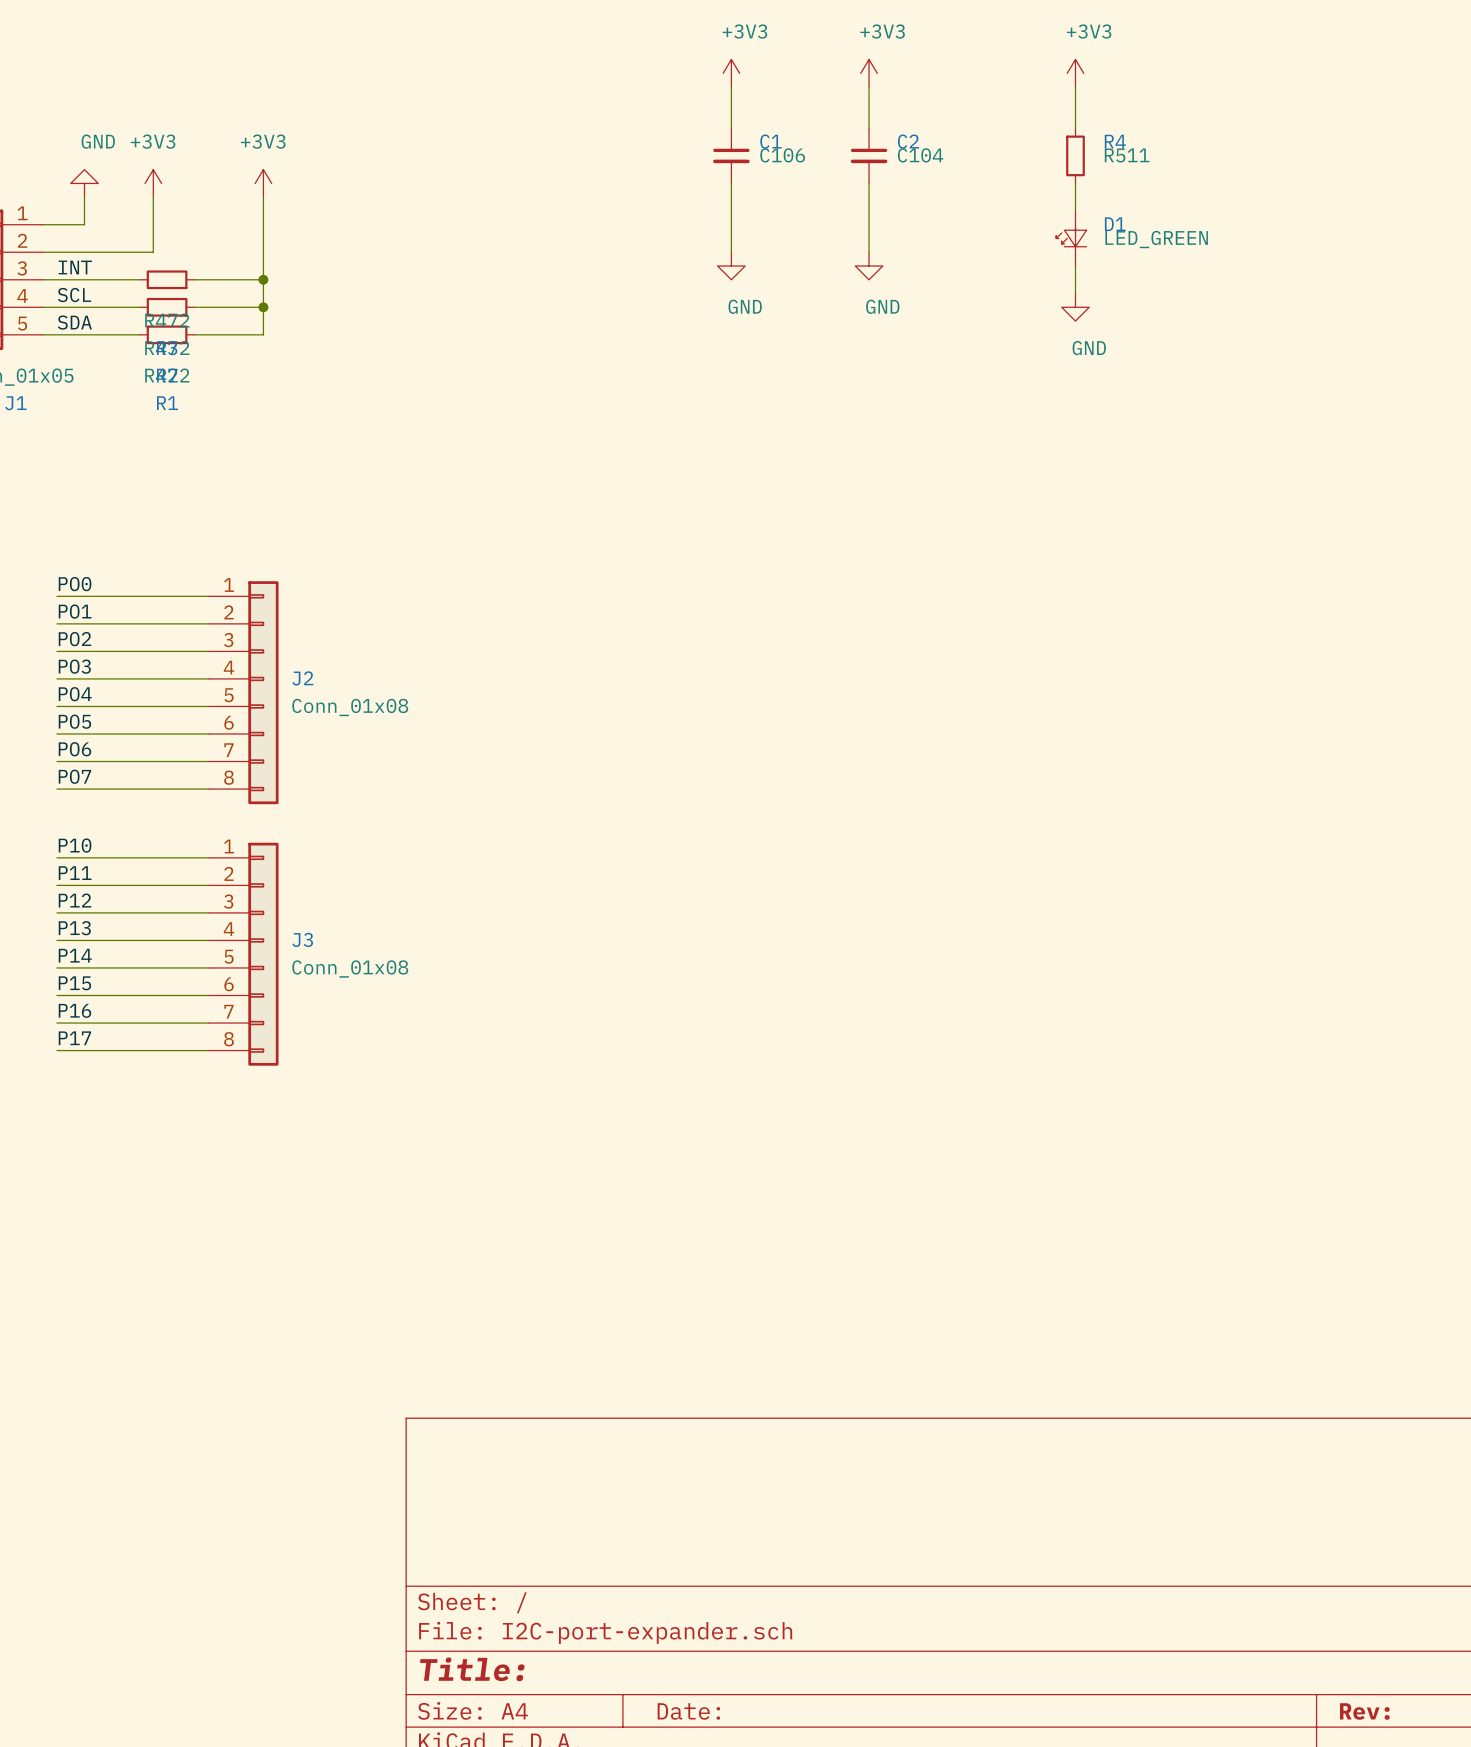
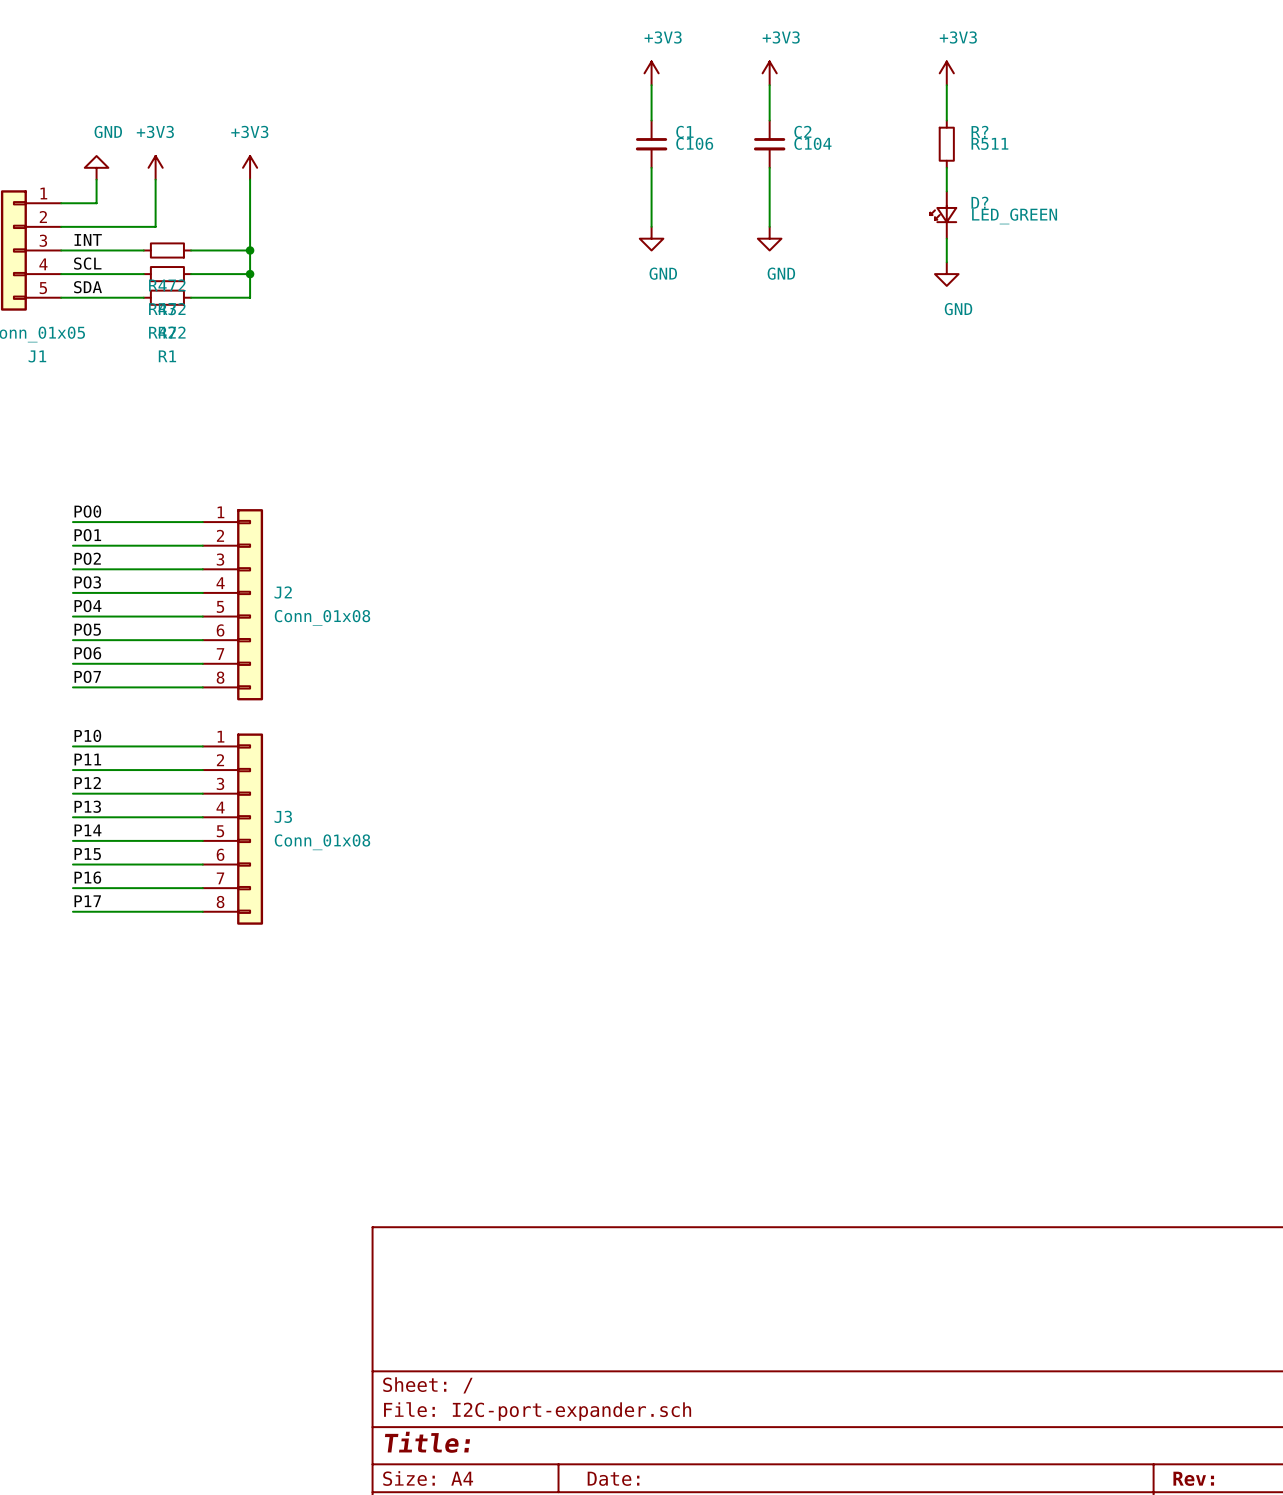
R4 name: R4 (1115, 141) -> R? (979, 131)
D1 name: D1 (1115, 224) -> D? (979, 202)

